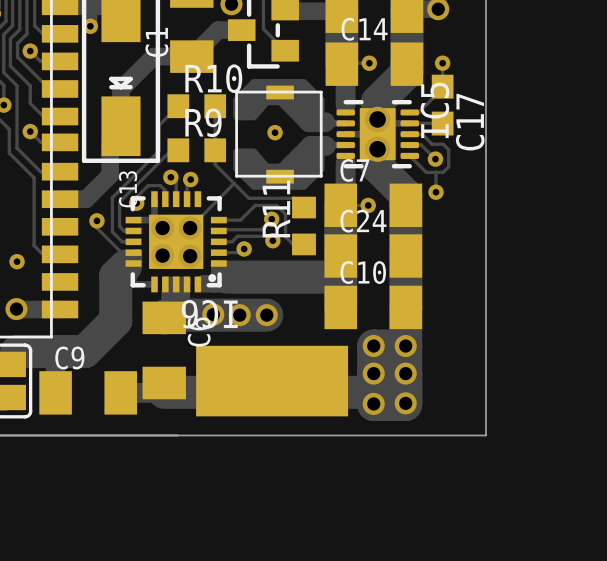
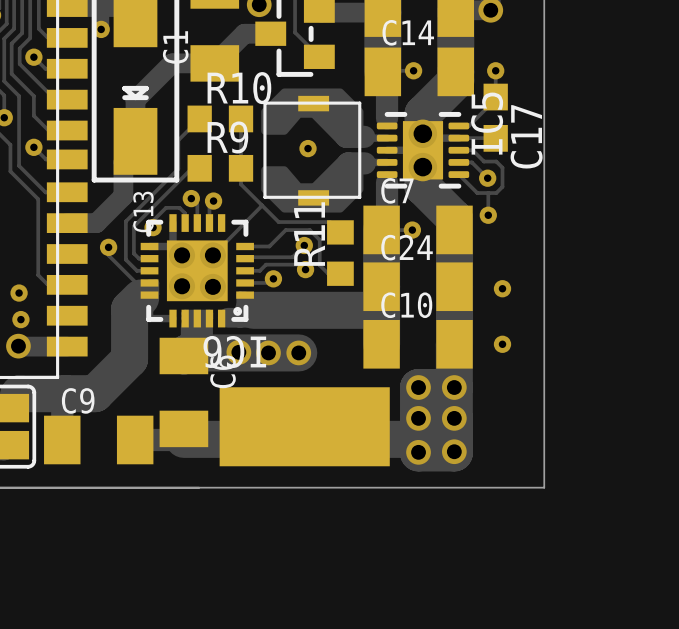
via: none -> (502, 288)
via: none -> (20, 319)
via: none -> (502, 344)

